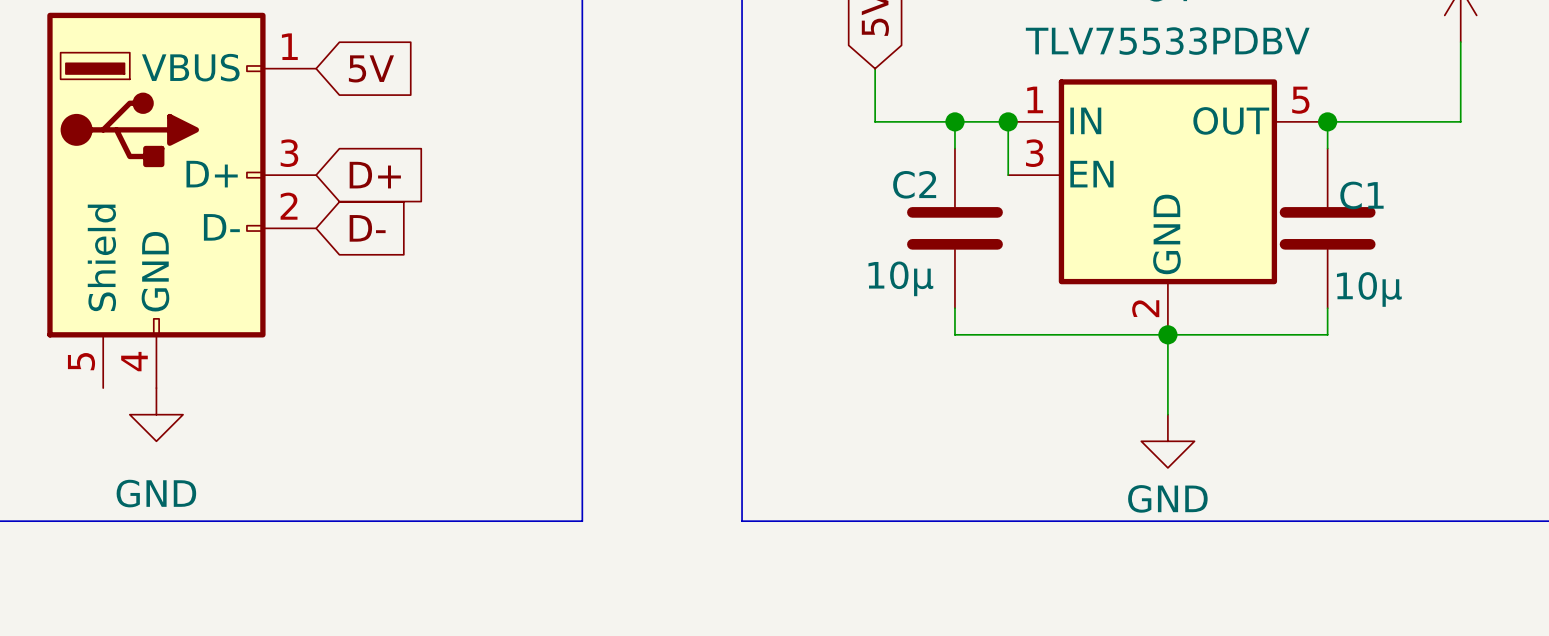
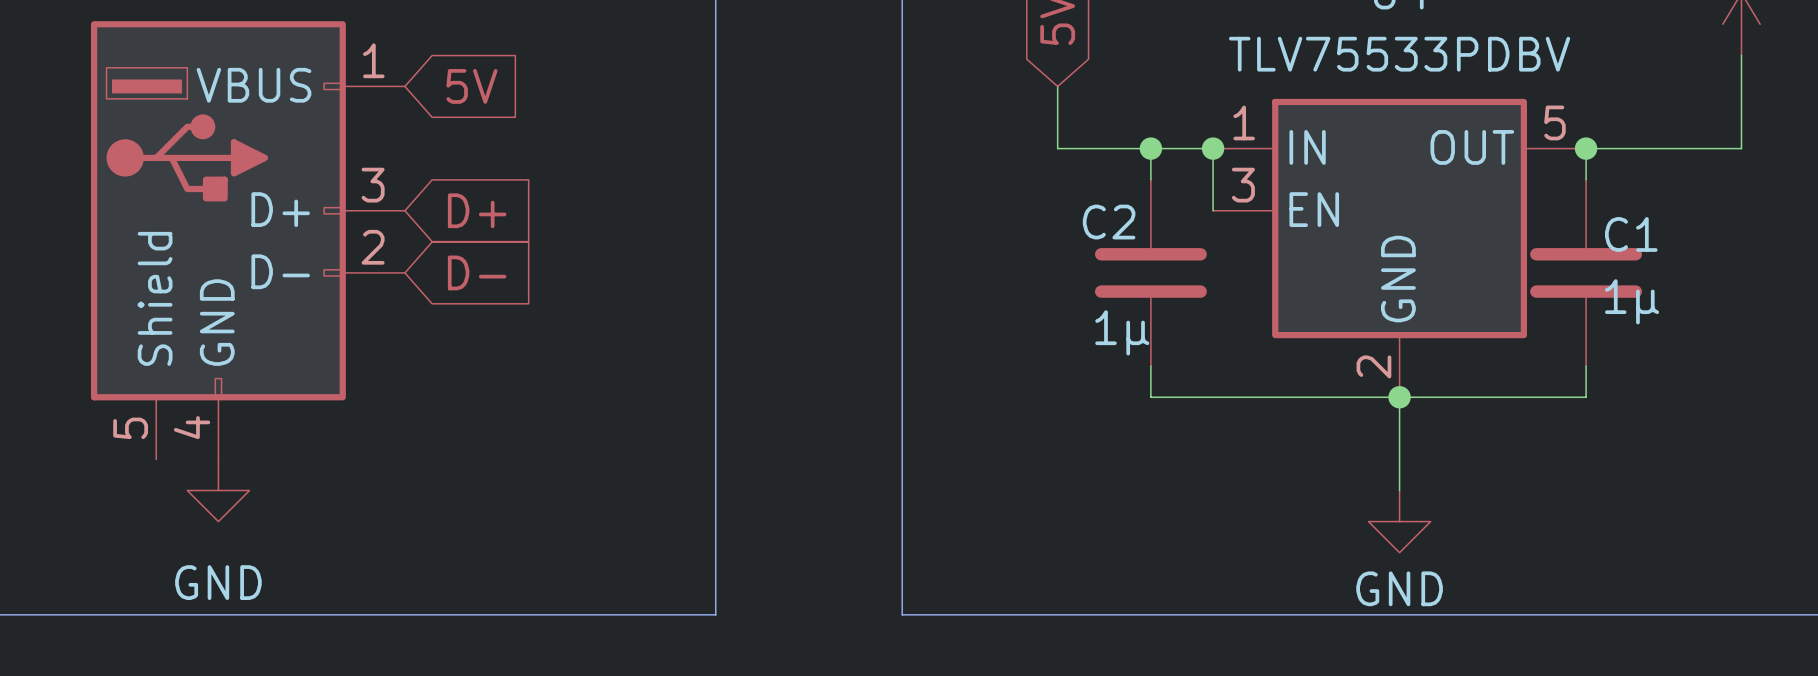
C2 value: 10µ (900, 278) -> 1µ (1122, 332)
C1 value: 10µ (1369, 289) -> 1µ (1632, 301)

